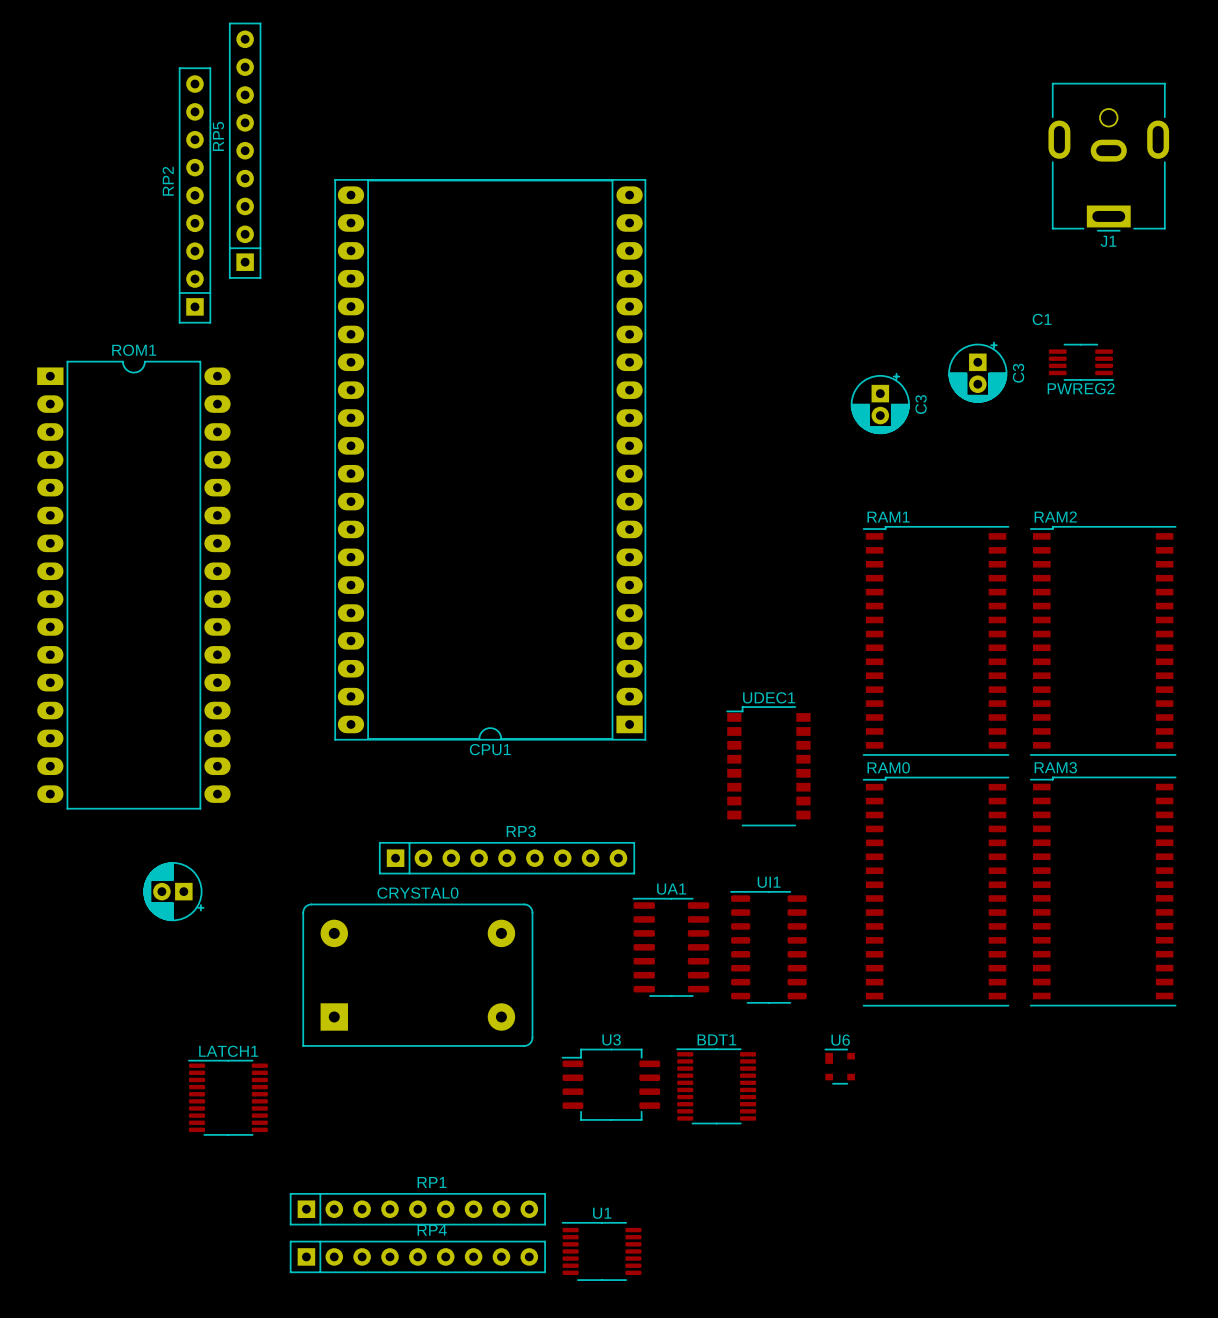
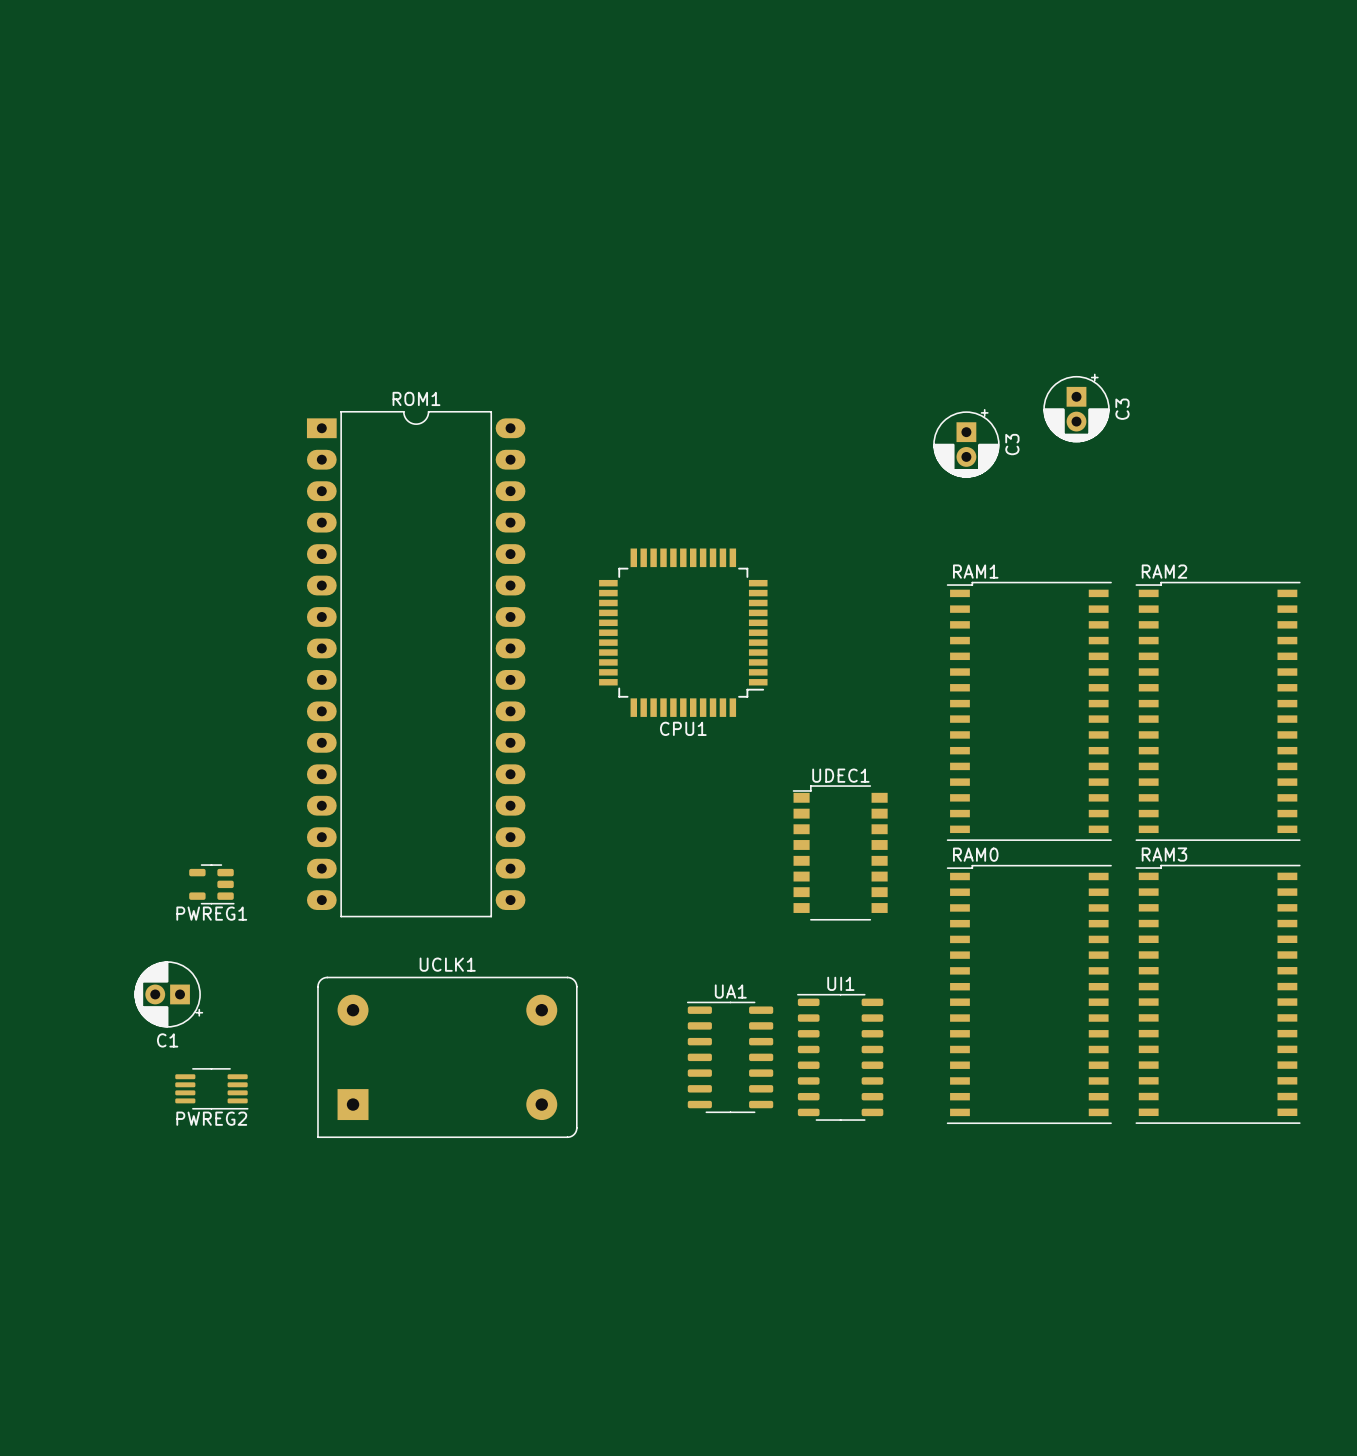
RP5: (245, 150) -> none
J1: (1108, 157) -> none
CPU1 footprint: [334, 179, 647, 741] -> [599, 548, 768, 717]
RP2: (194, 195) -> none
C1 name position: C1 (1042, 319) -> C1 (167, 1040)
PWREG2 position: (1081, 362) -> (211, 1088)
ROM1 position: (133, 585) -> (416, 664)
CPU1 name position: CPU1 (490, 749) -> CPU1 (683, 728)
PWREG1: none -> (211, 884)
RP3: (507, 858) -> none
UCLK1: none -> (447, 1057)
CRYSTAL0: (417, 975) -> none
U6: (839, 1066) -> none
U3: (611, 1084) -> none
BDT1: (716, 1086) -> none
LATCH1: (228, 1097) -> none
RP1: (417, 1209) -> none
U1: (601, 1251) -> none
RP4: (417, 1256) -> none

